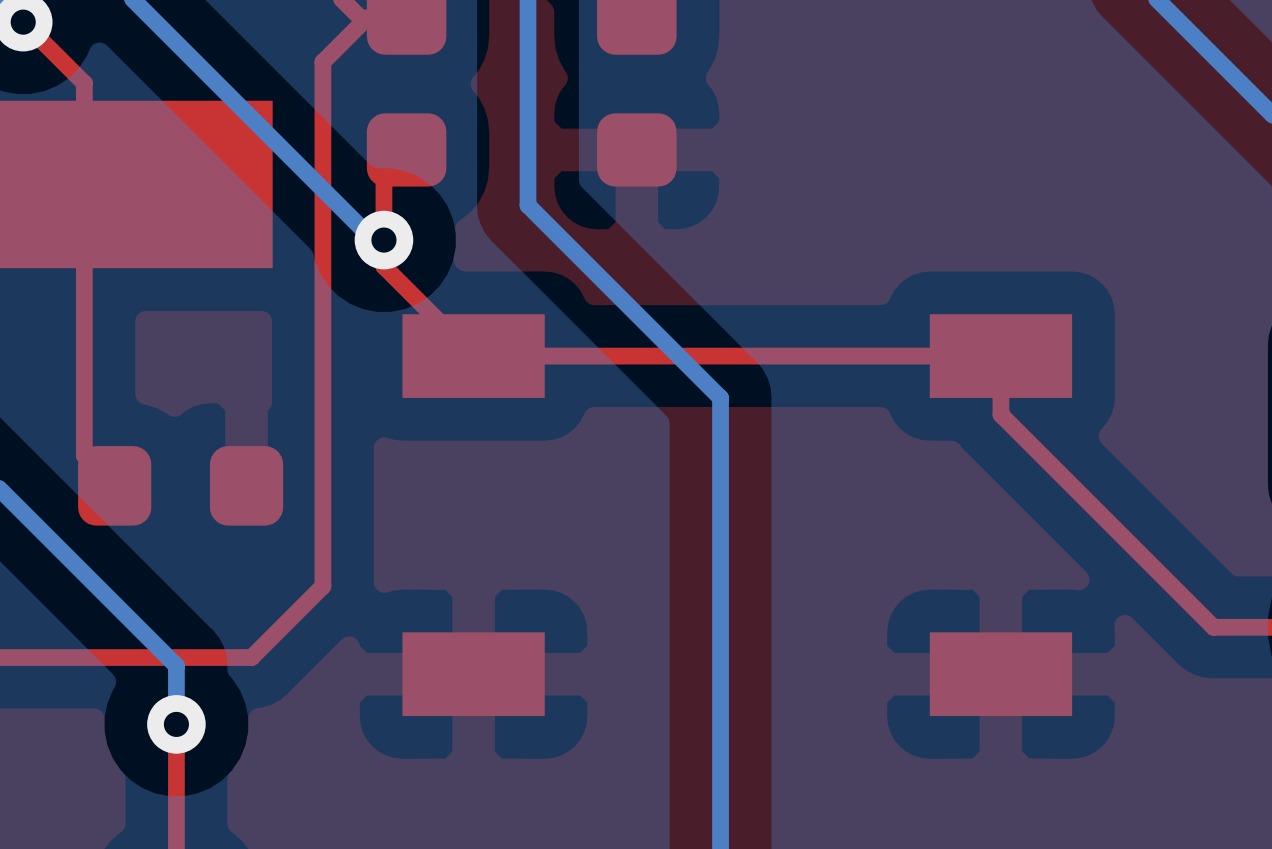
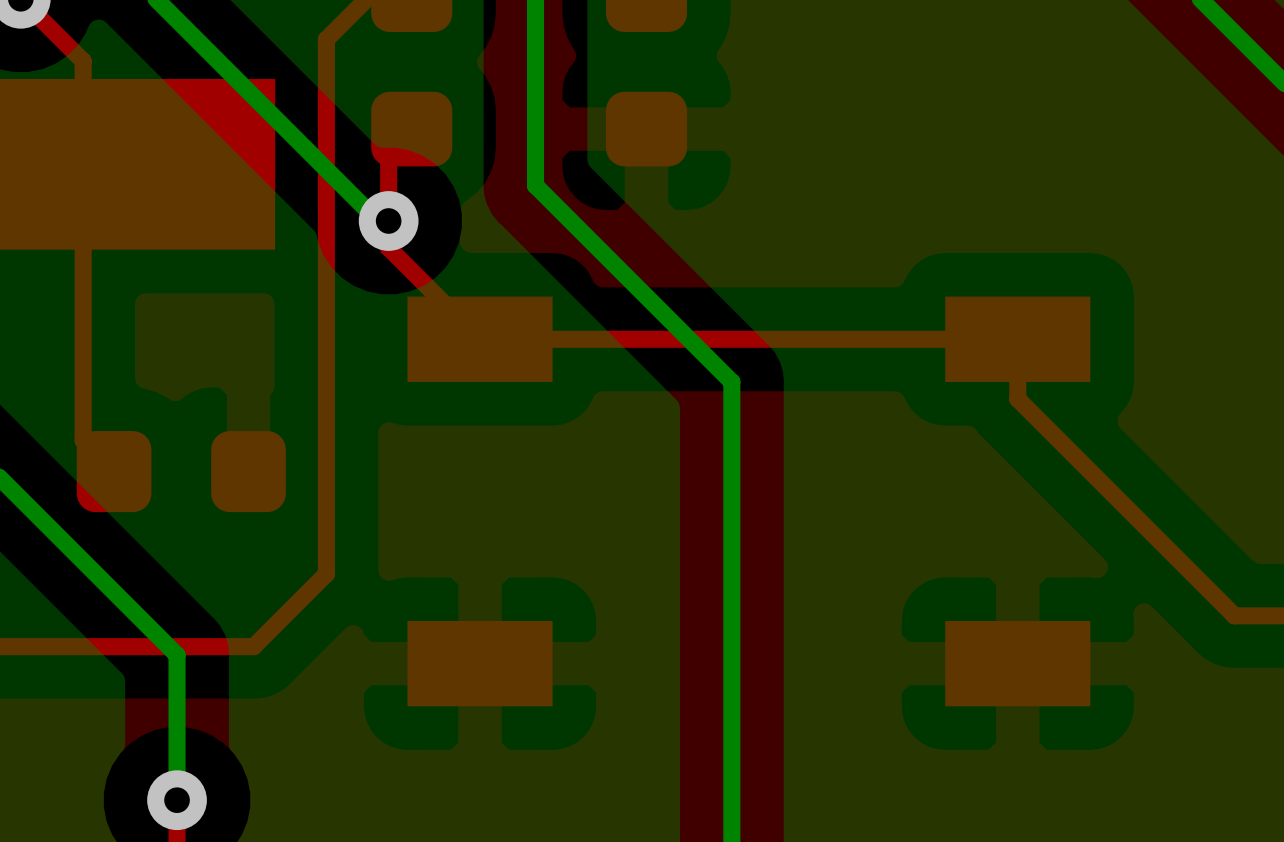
bottom track: none -> (177, 714) (177, 800)
top track: (176, 724) (176, 808) -> none
via position: (176, 724) -> (177, 800)

